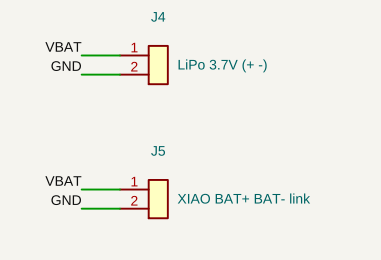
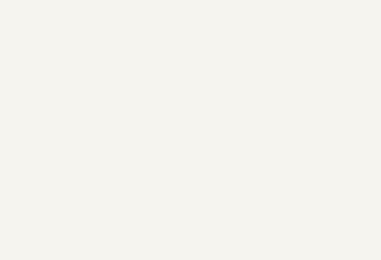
label: VBAT (63, 46) -> none
wire: (81, 55) (119, 55) -> none
J4: LiPo 3.7V (+ -) (144, 65) -> none
label: GND (66, 66) -> none
wire: (81, 74) (119, 74) -> none
label: VBAT (63, 180) -> none
wire: (81, 189) (119, 189) -> none
J5: XIAO BAT+ BAT- link (144, 199) -> none
label: GND (66, 200) -> none
wire: (81, 208) (119, 208) -> none

